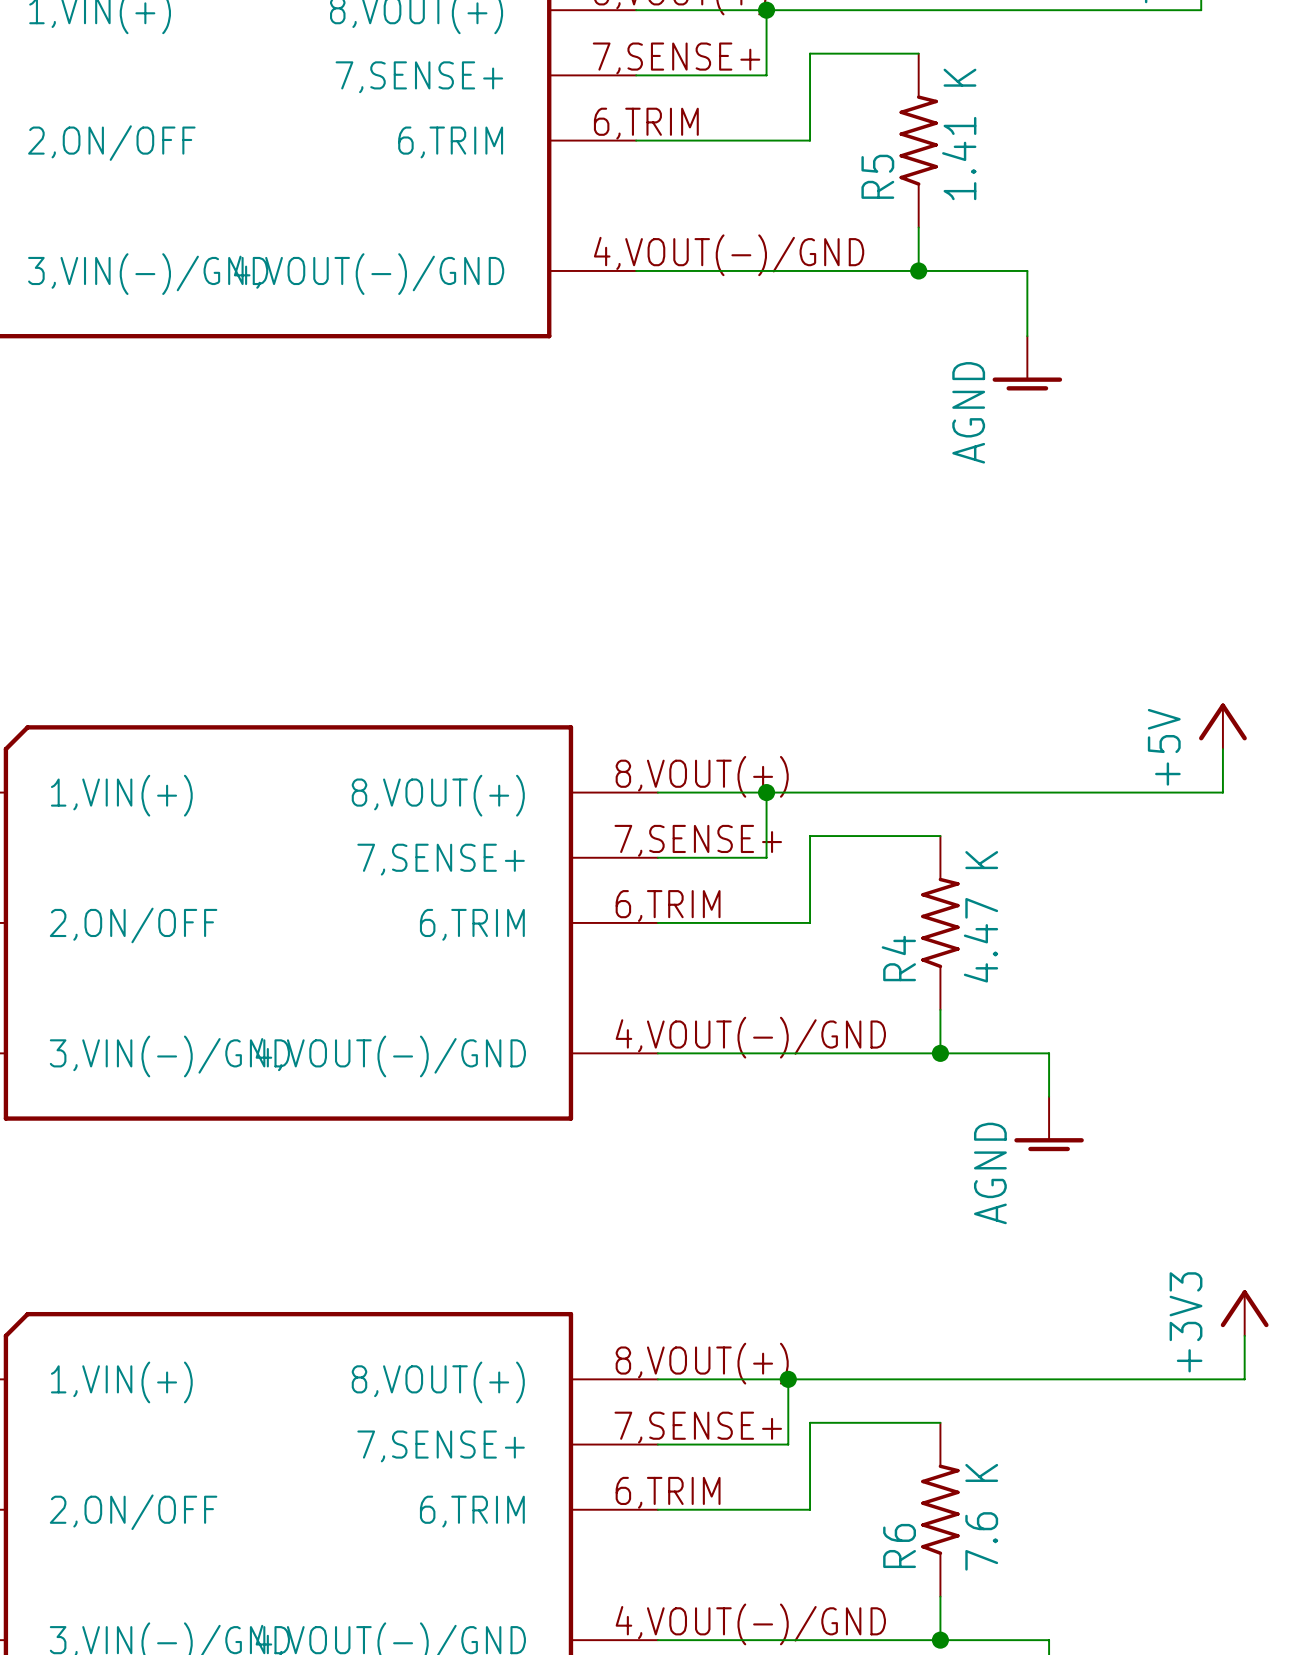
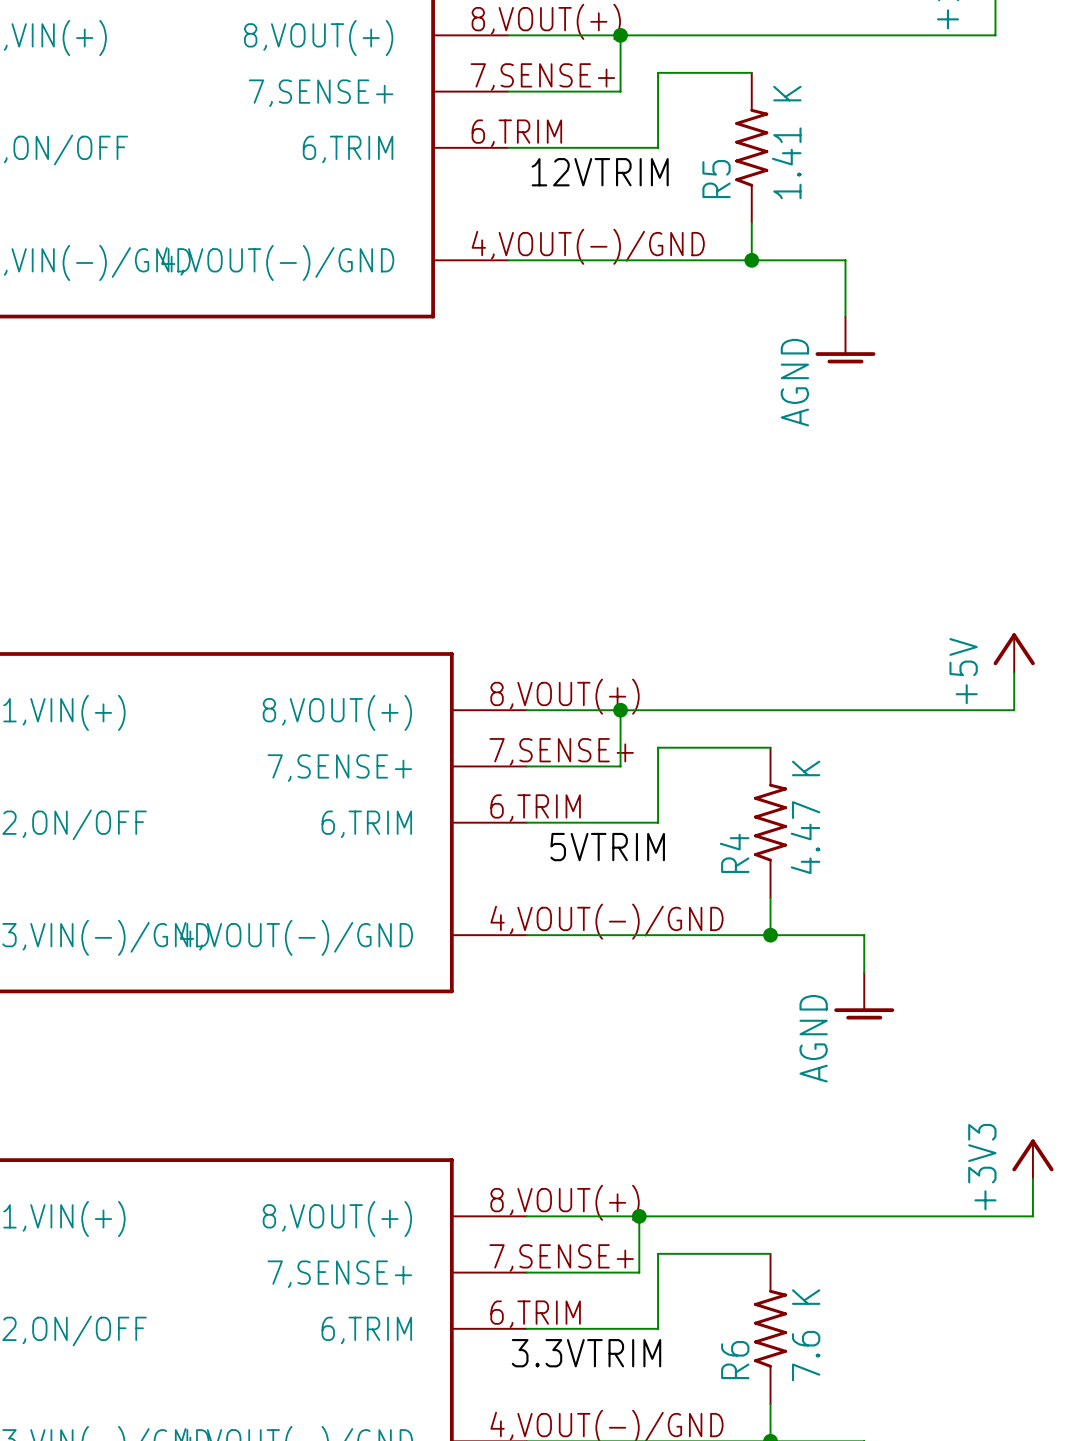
label: none -> 12VTRIM (600, 172)
label: none -> 5VTRIM (607, 847)
label: none -> 3.3VTRIM (586, 1353)

